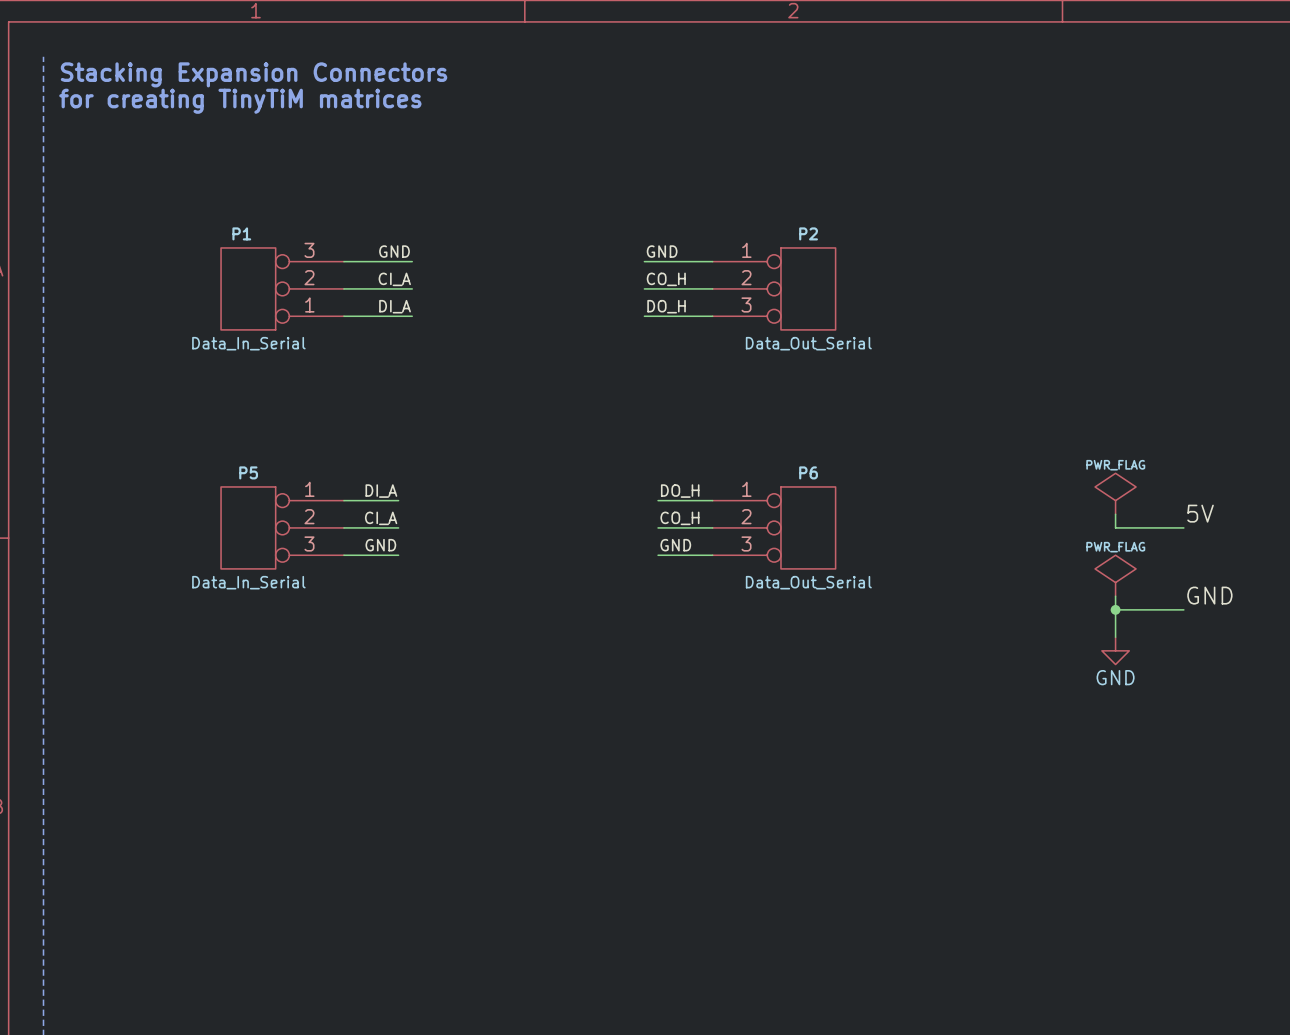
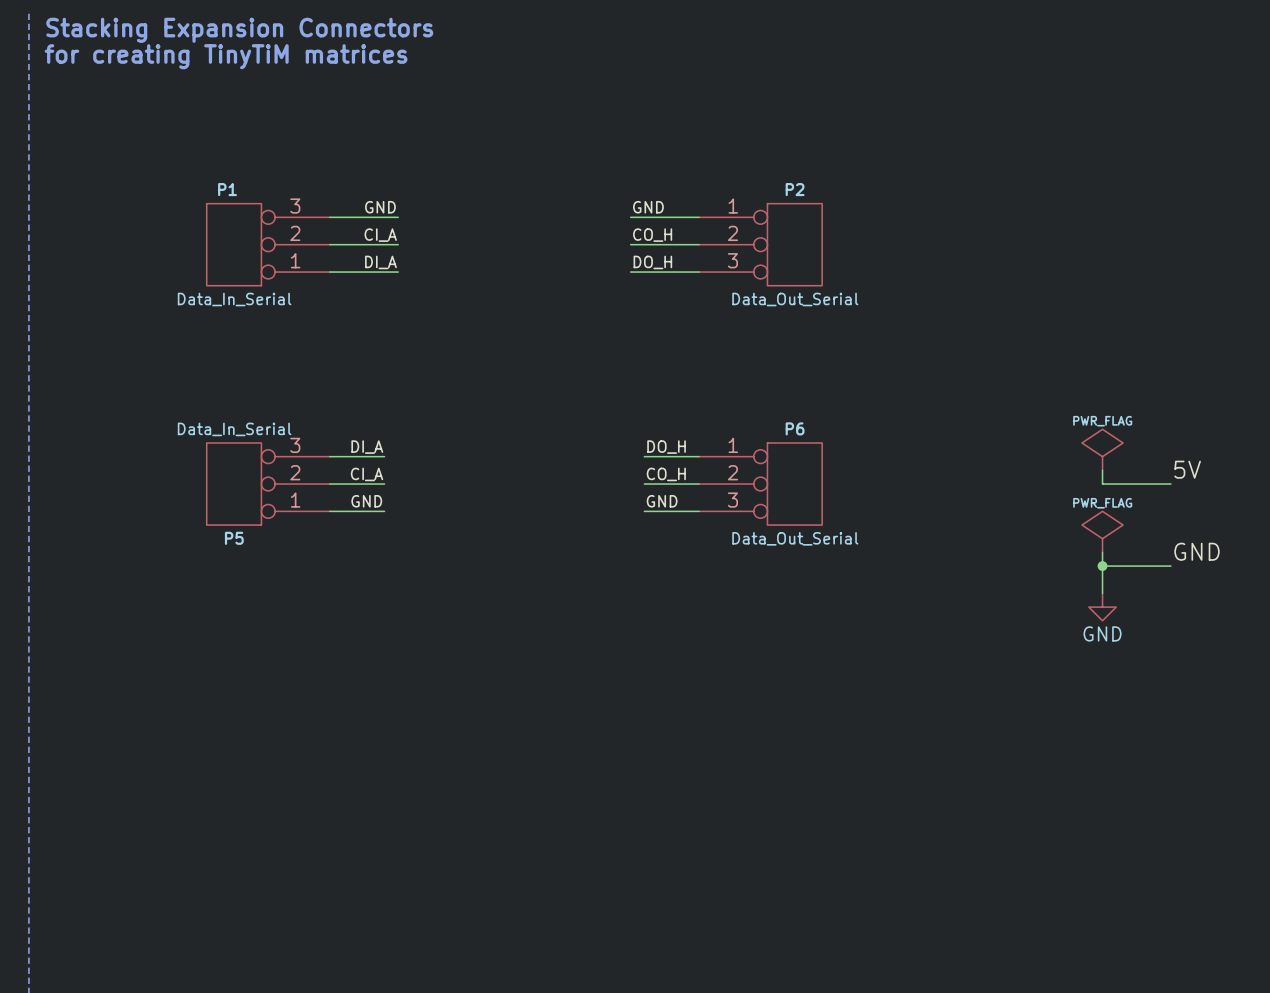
P5 flip: as is (248, 527) -> up-down (234, 484)

